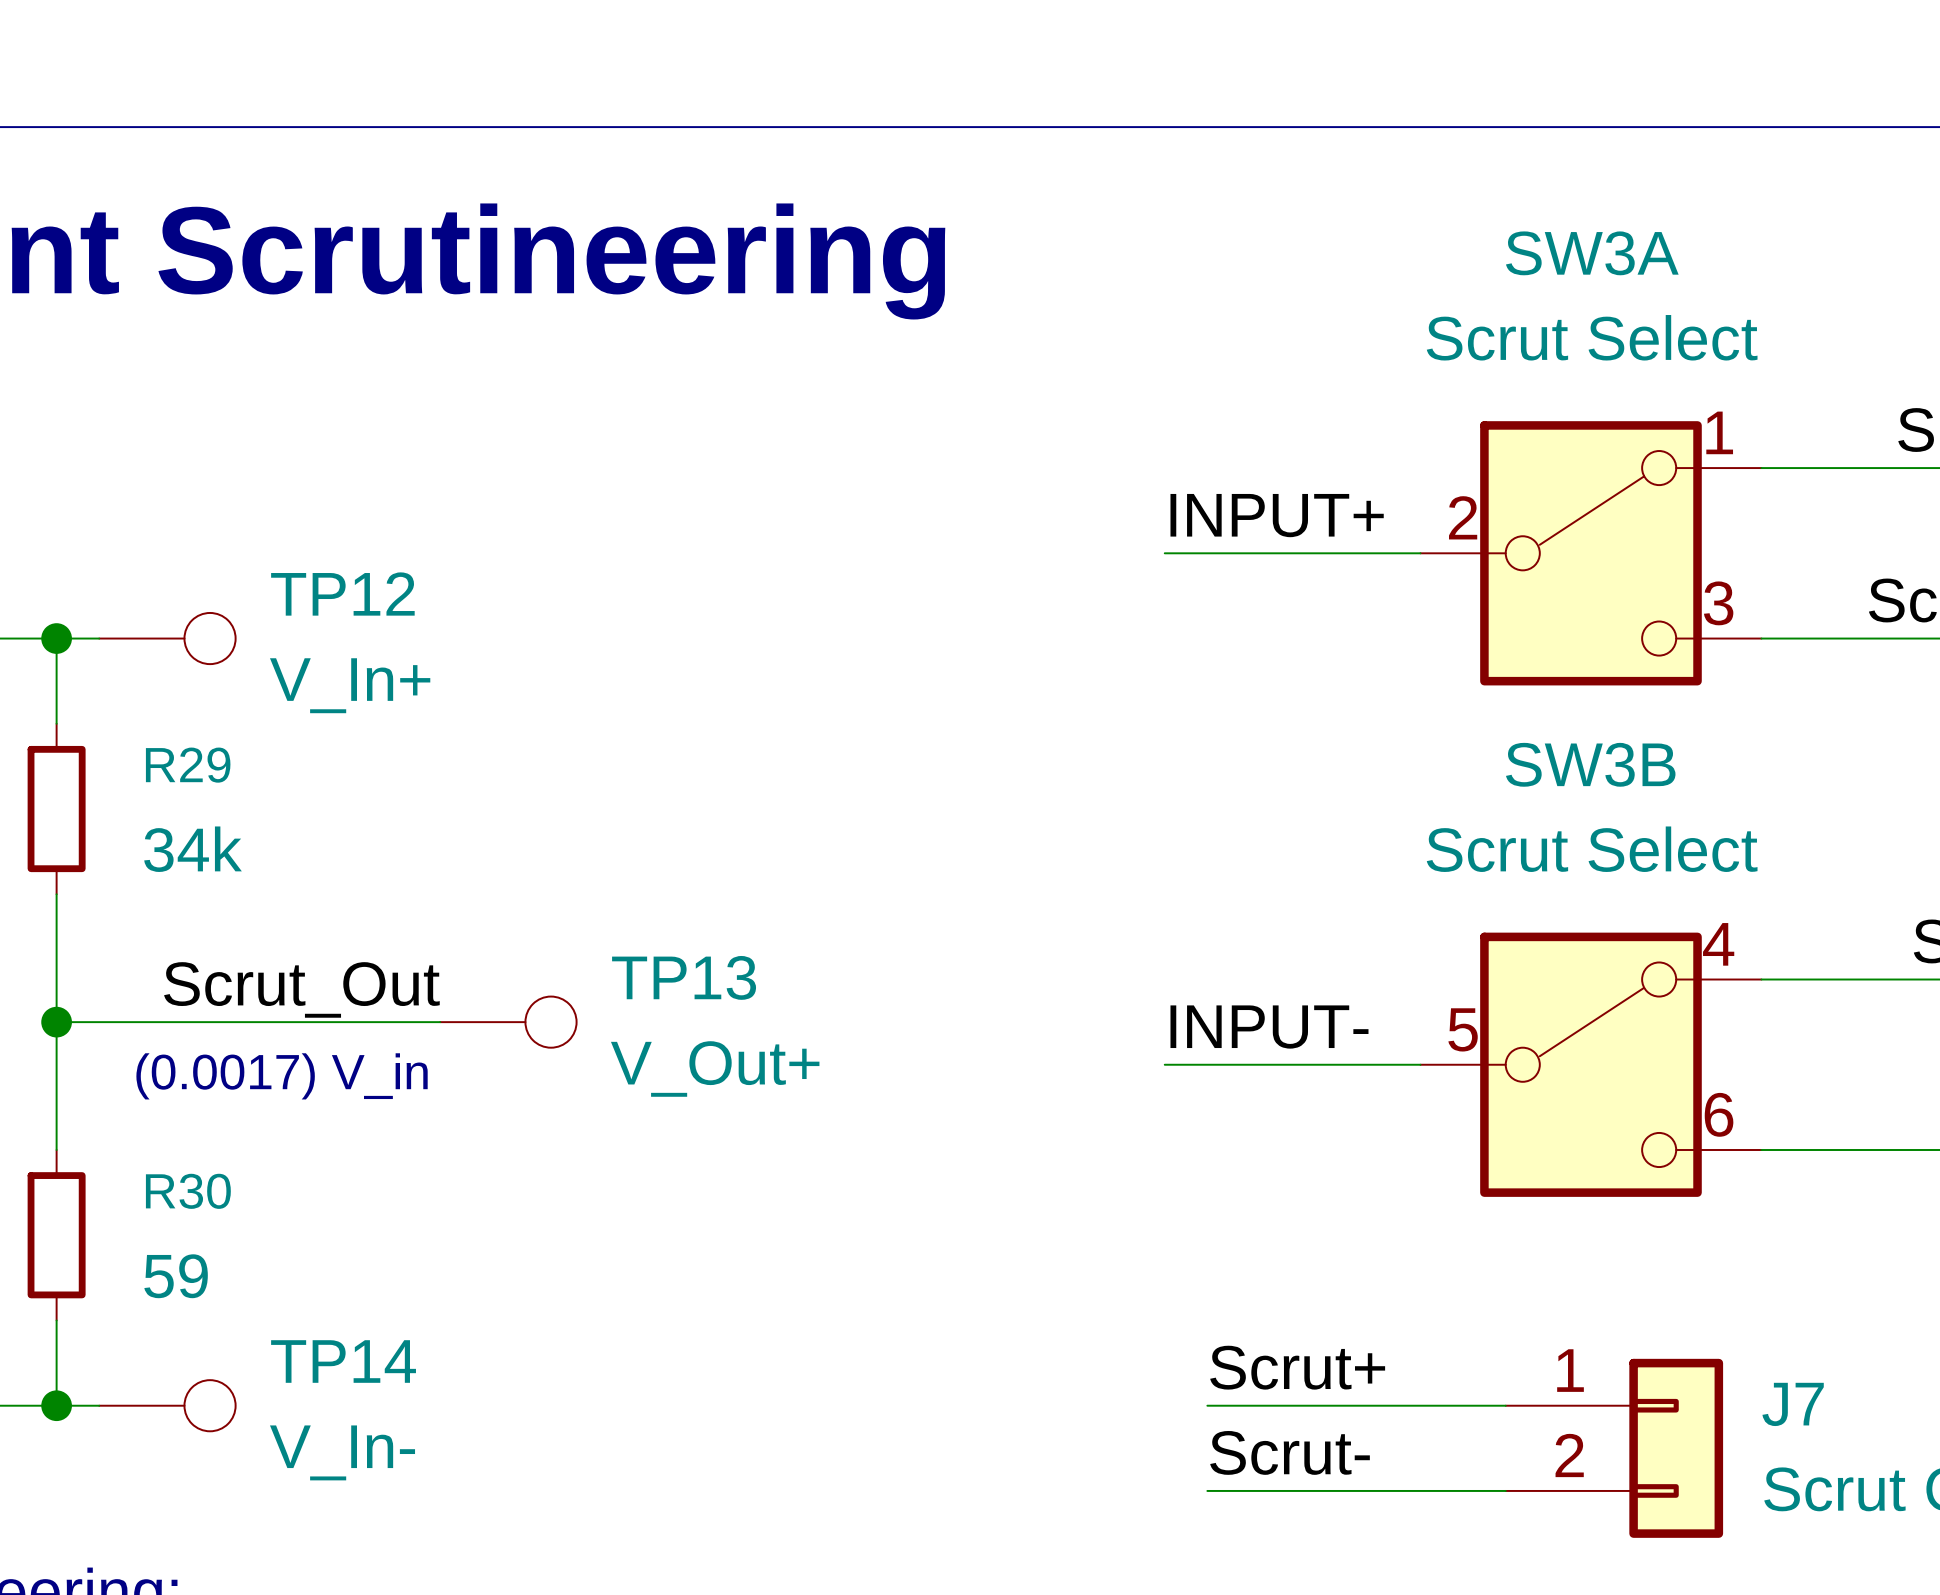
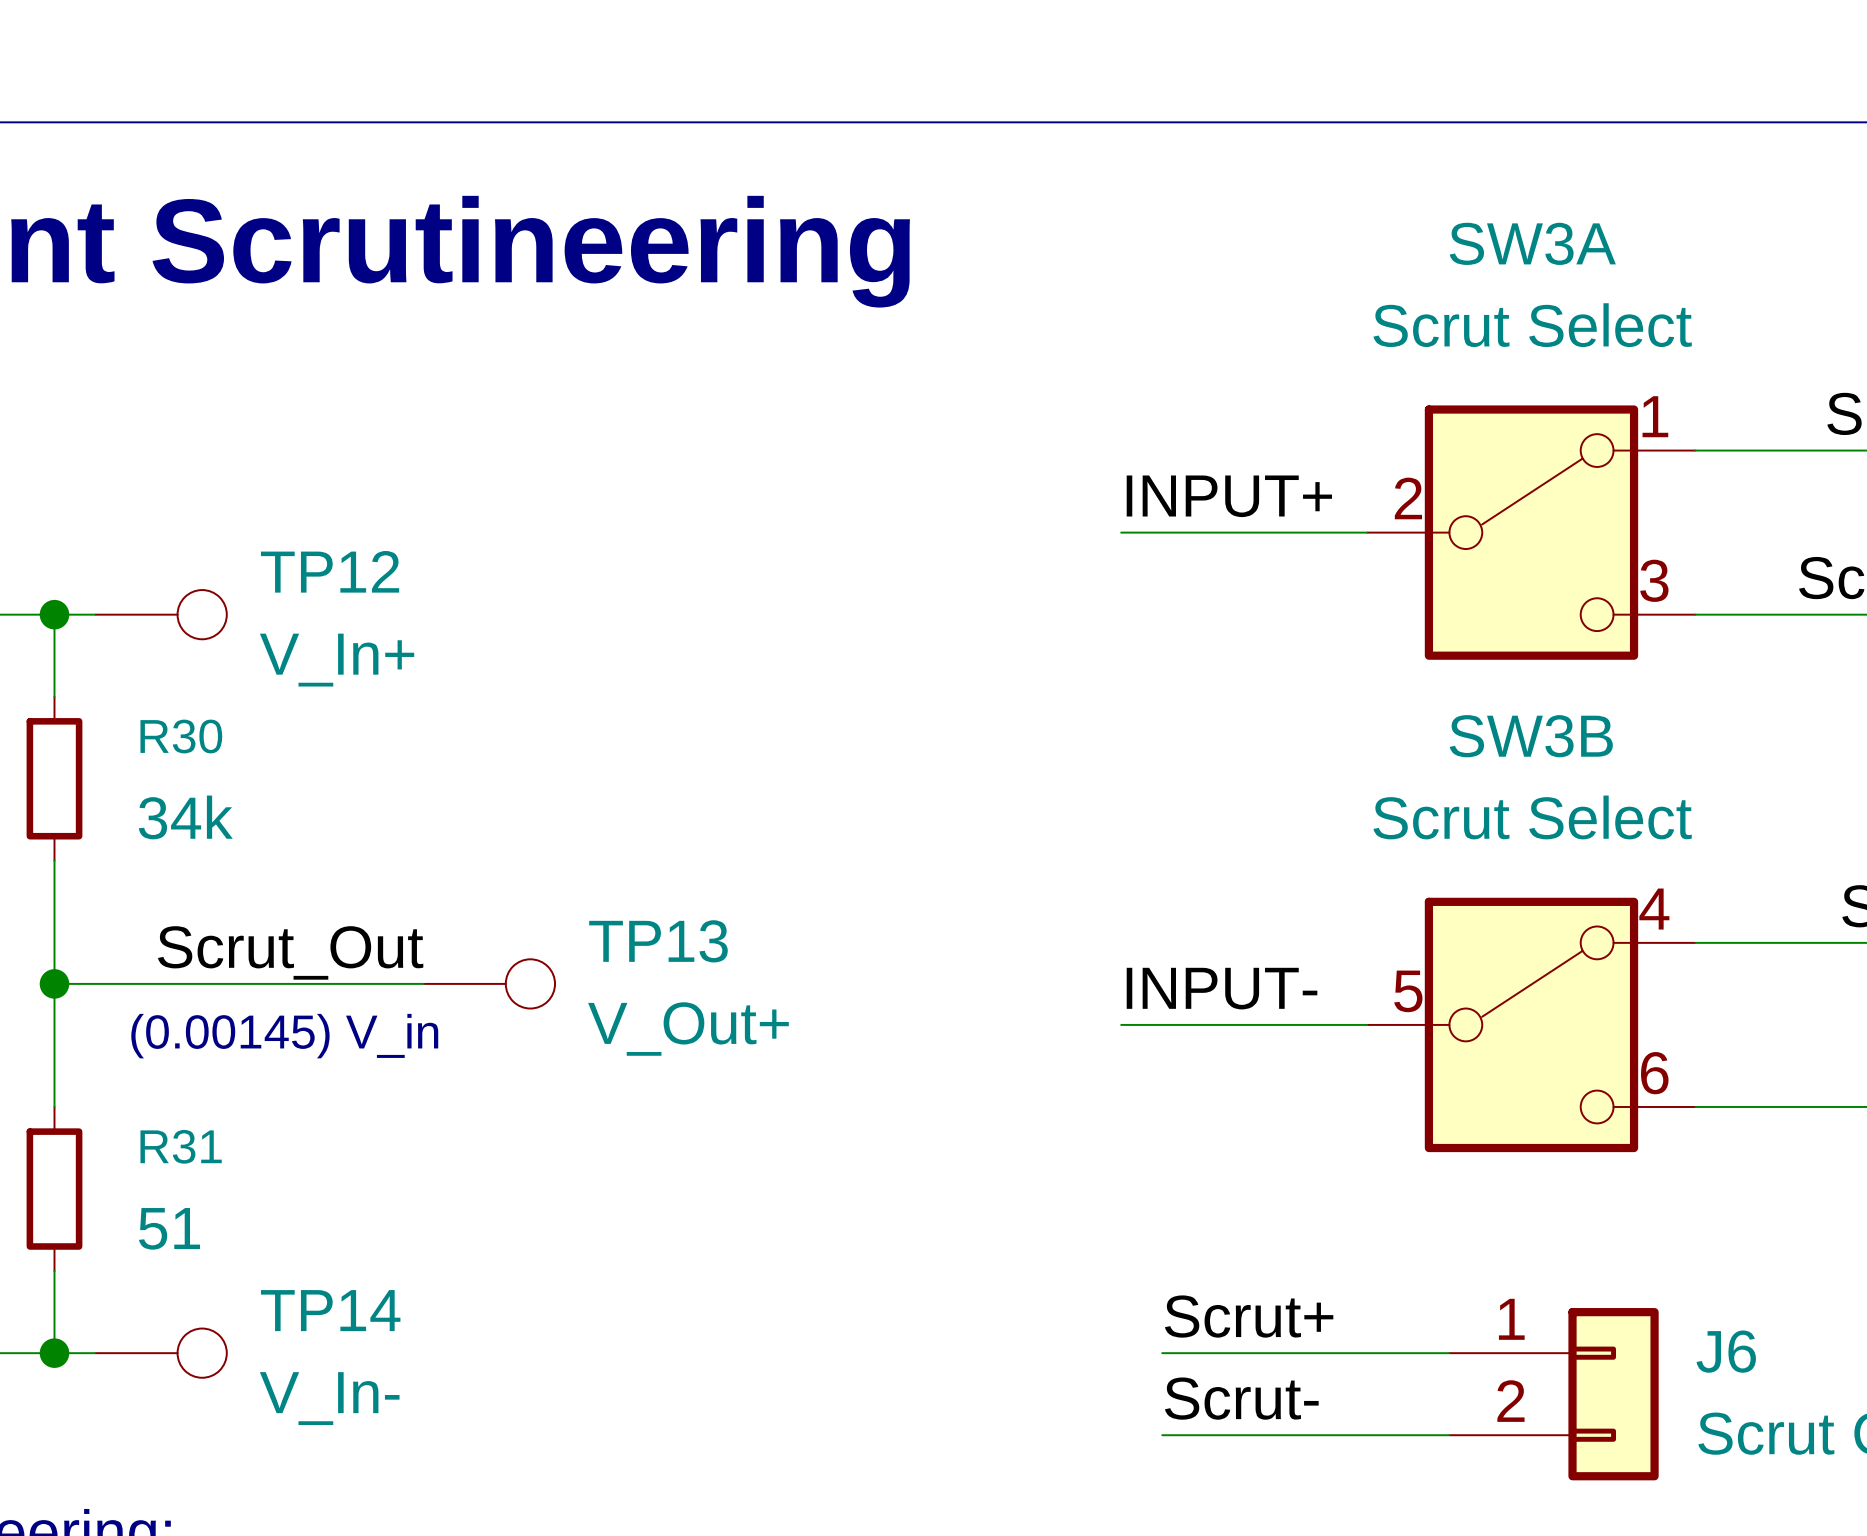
R29 name: R29 (188, 765) -> R30 (181, 736)
text: (0.0017) V_in (282, 1076) -> (0.00145) V_in (284, 1036)
R30 name: R30 (188, 1191) -> R31 (181, 1146)
R30 value: 59 (176, 1276) -> 51 (169, 1228)
J7 name: J7 (1793, 1404) -> J6 (1726, 1351)

